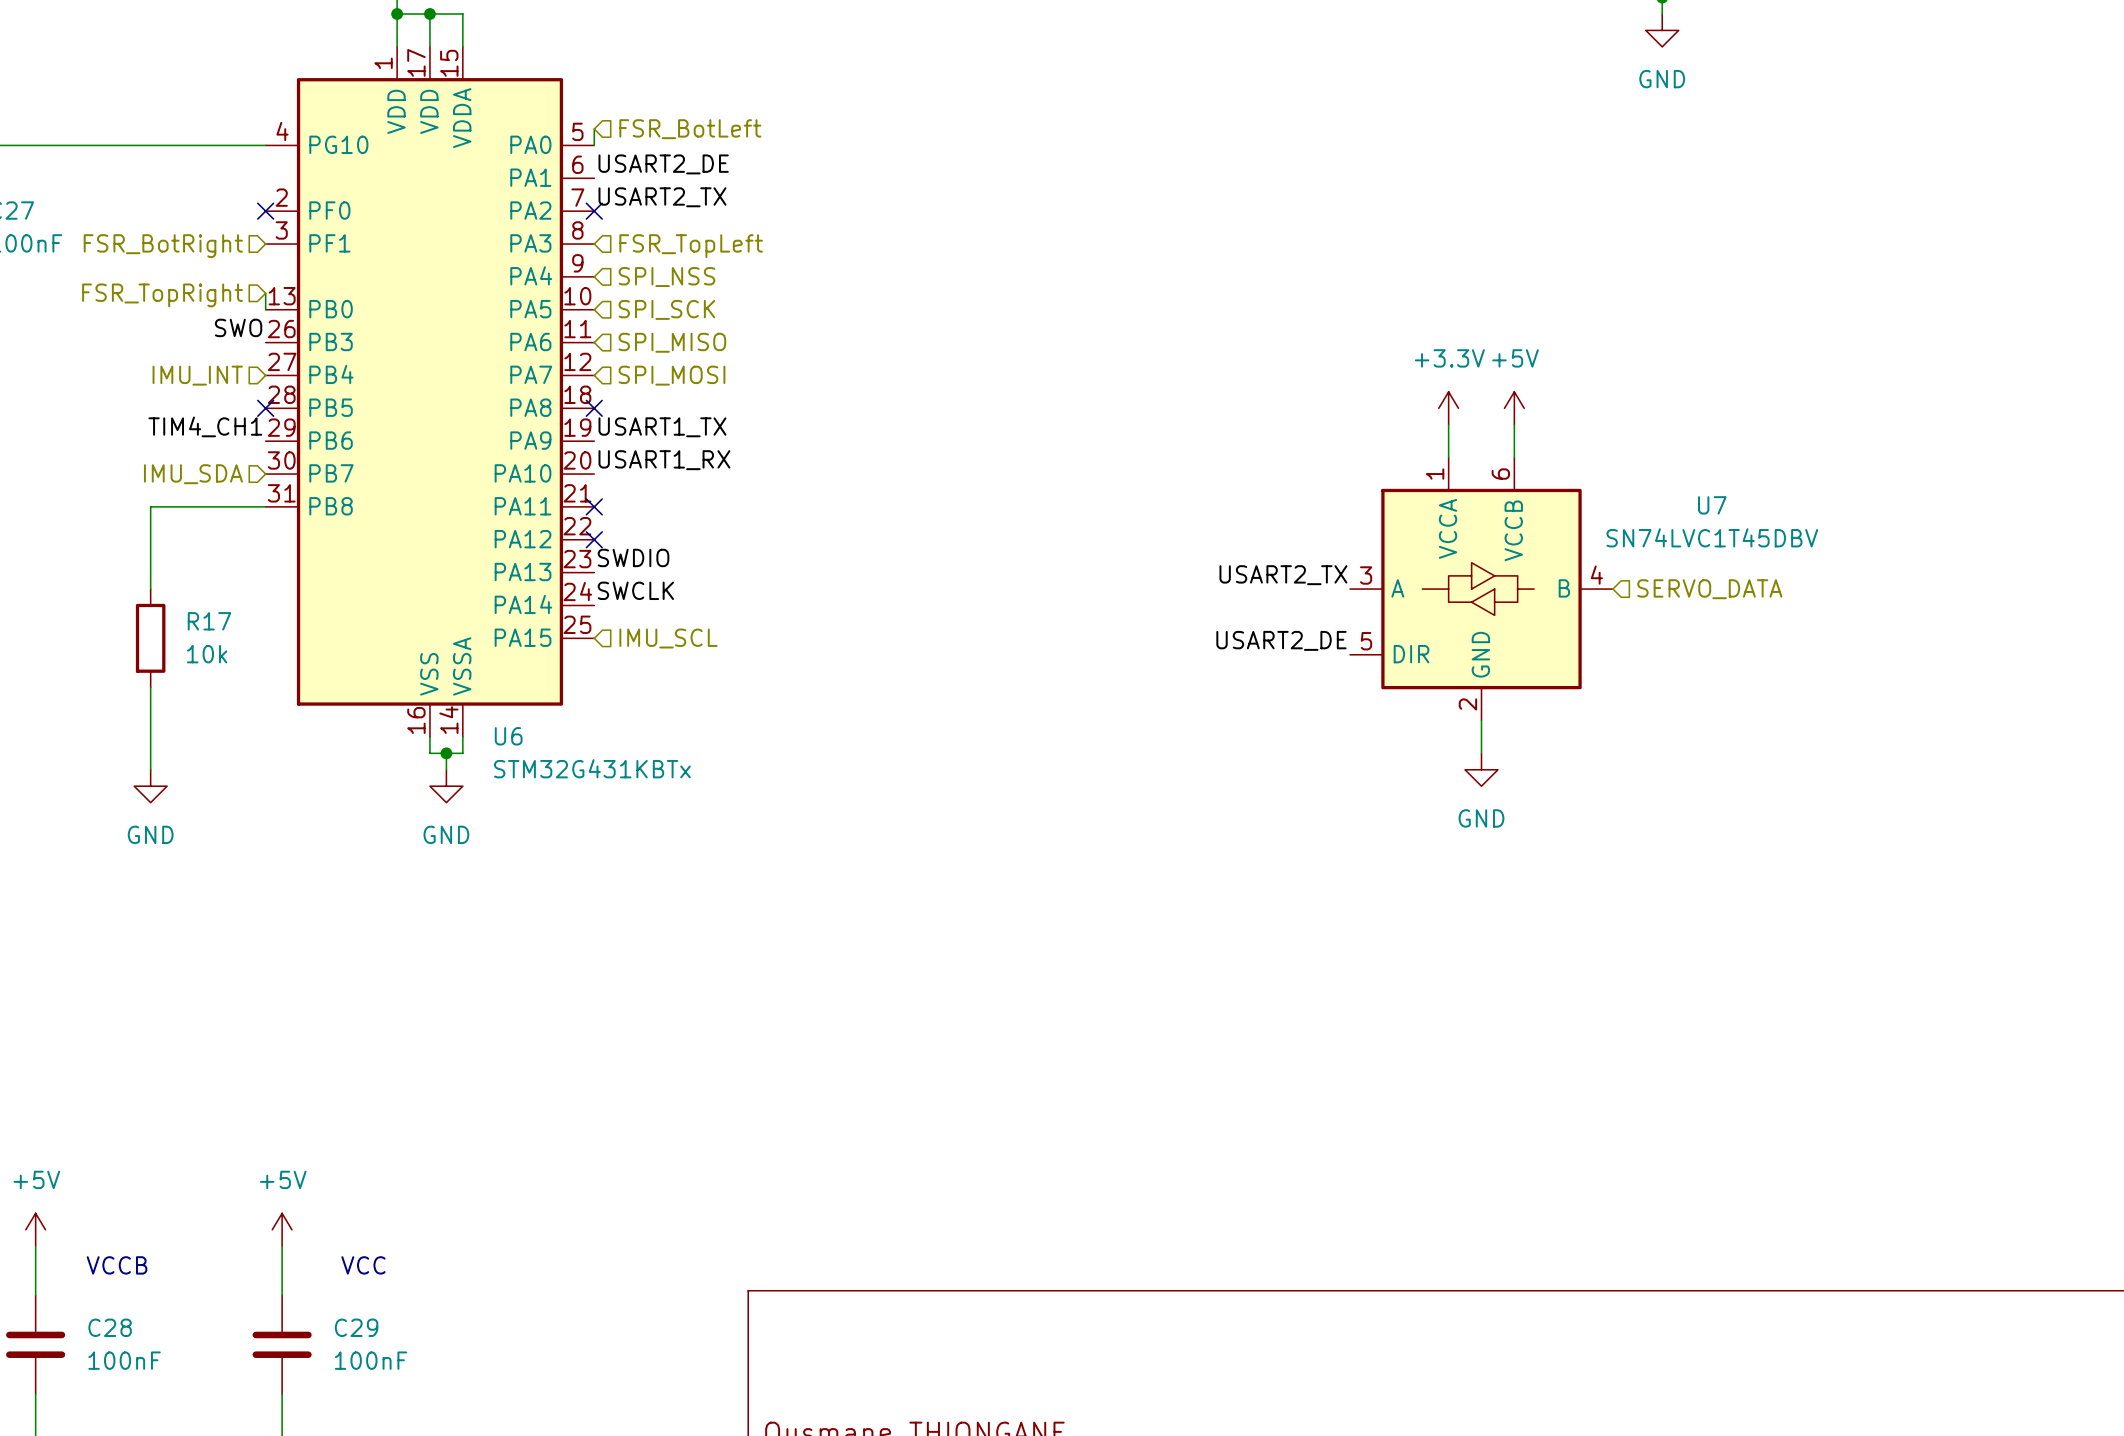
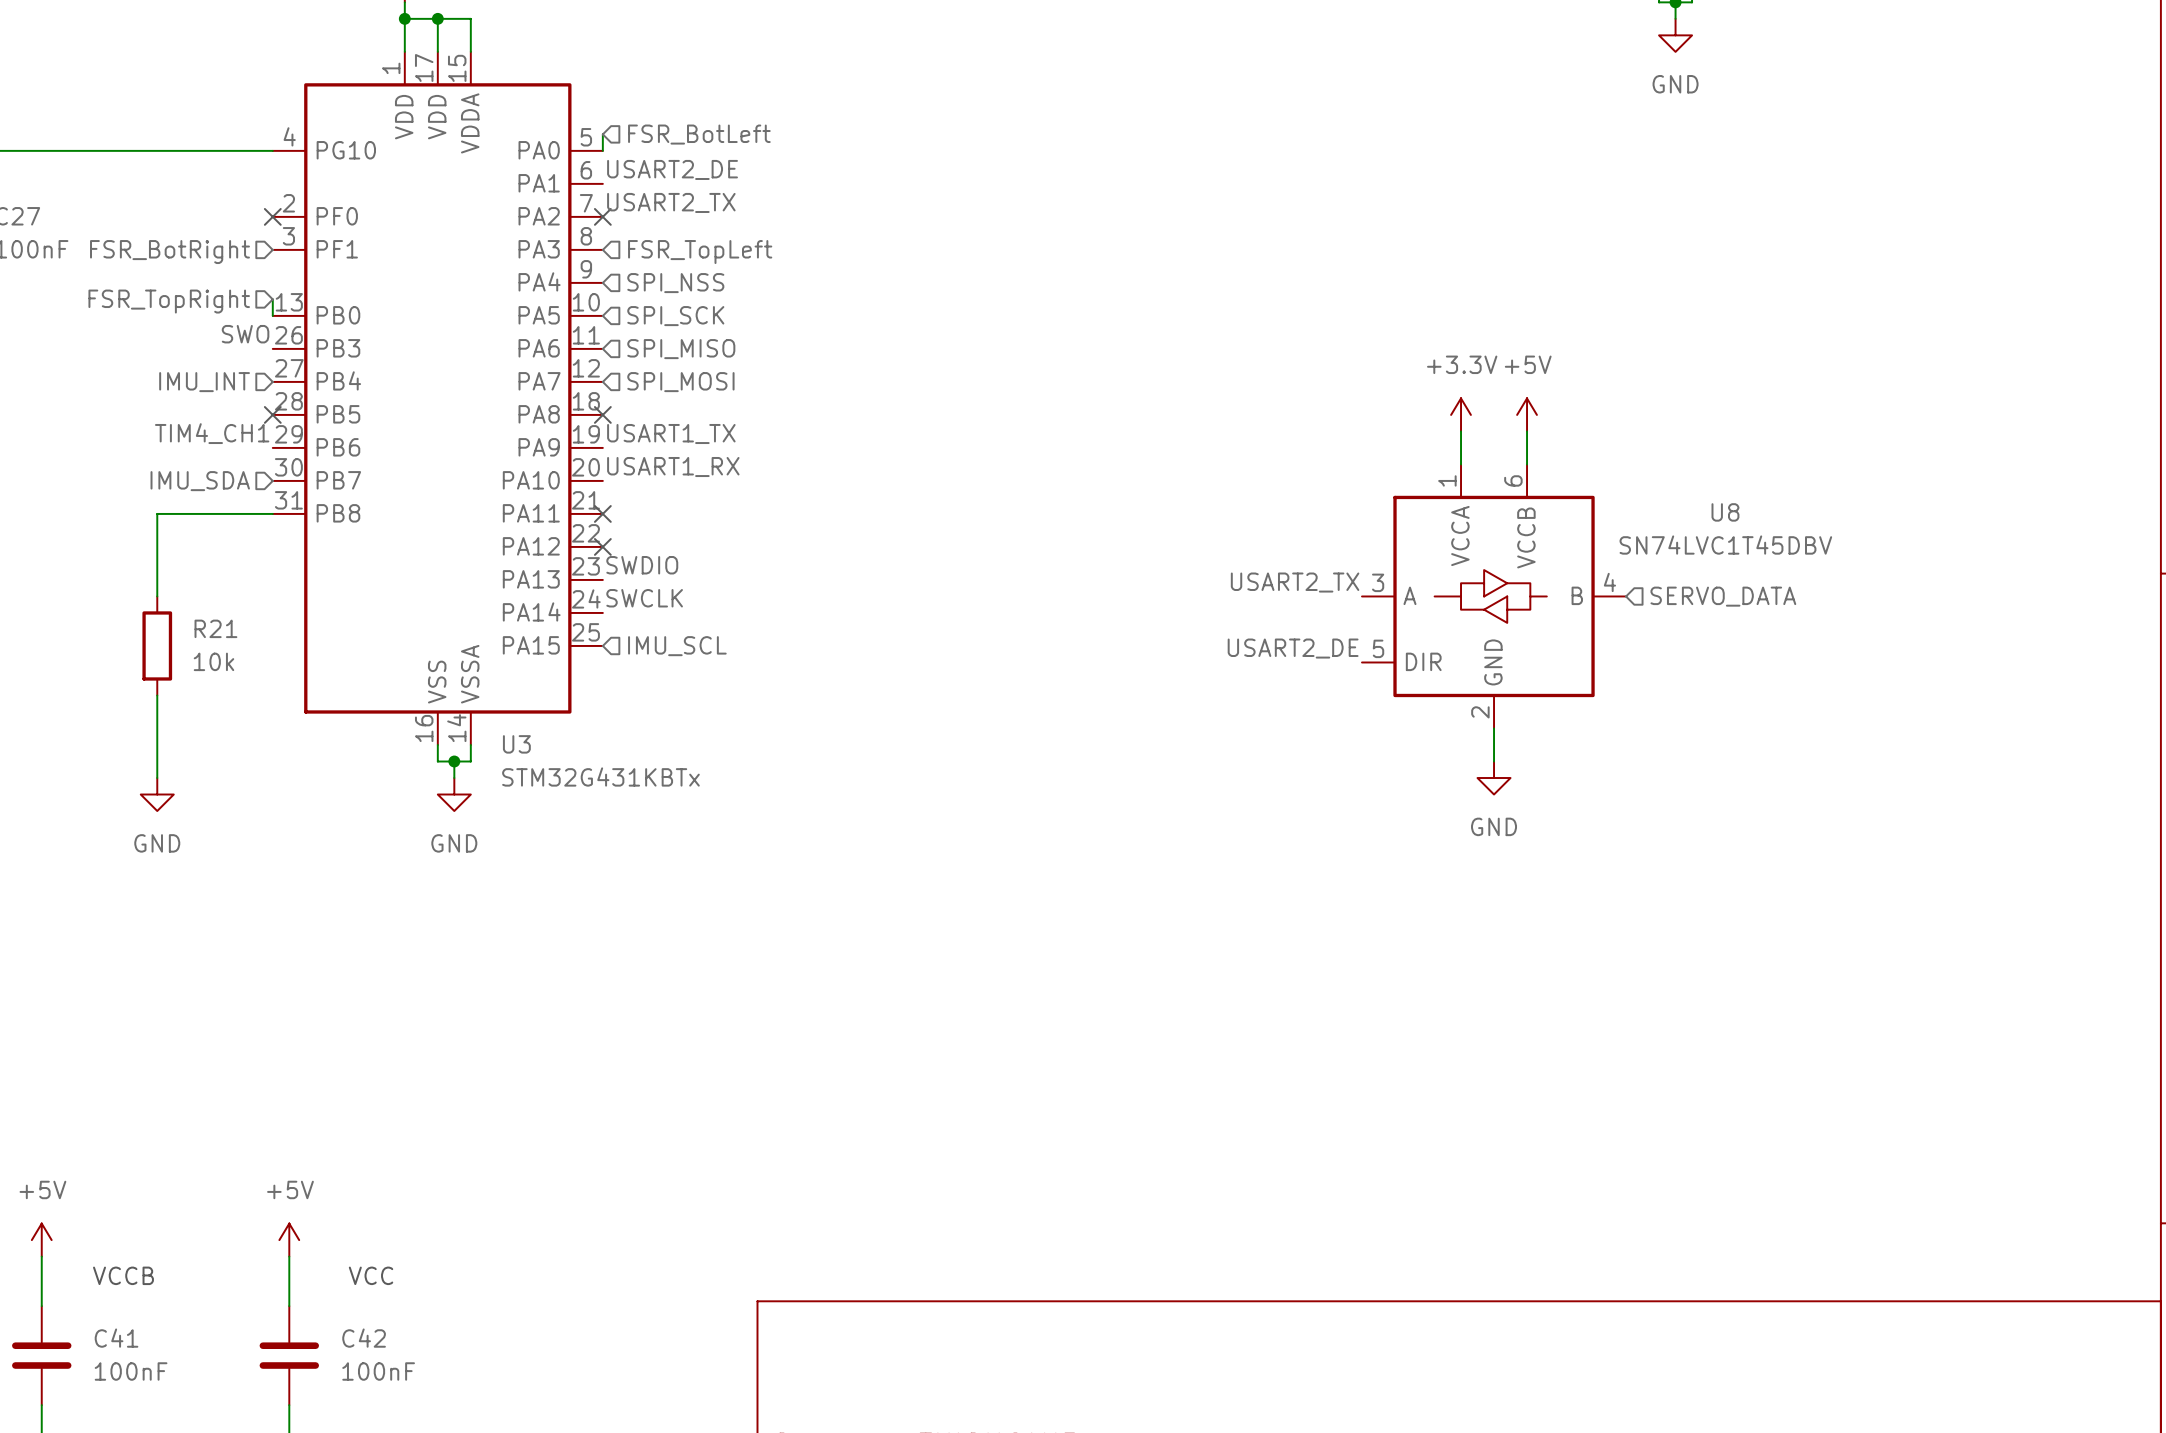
U7 name: U7 (1712, 505) -> U8 (1725, 512)
R17 name: R17 (209, 621) -> R21 (215, 628)
U6 name: U6 (508, 736) -> U3 (516, 744)
C28 name: C28 (110, 1327) -> C41 (116, 1338)
C29 name: C29 (356, 1327) -> C42 (364, 1338)

